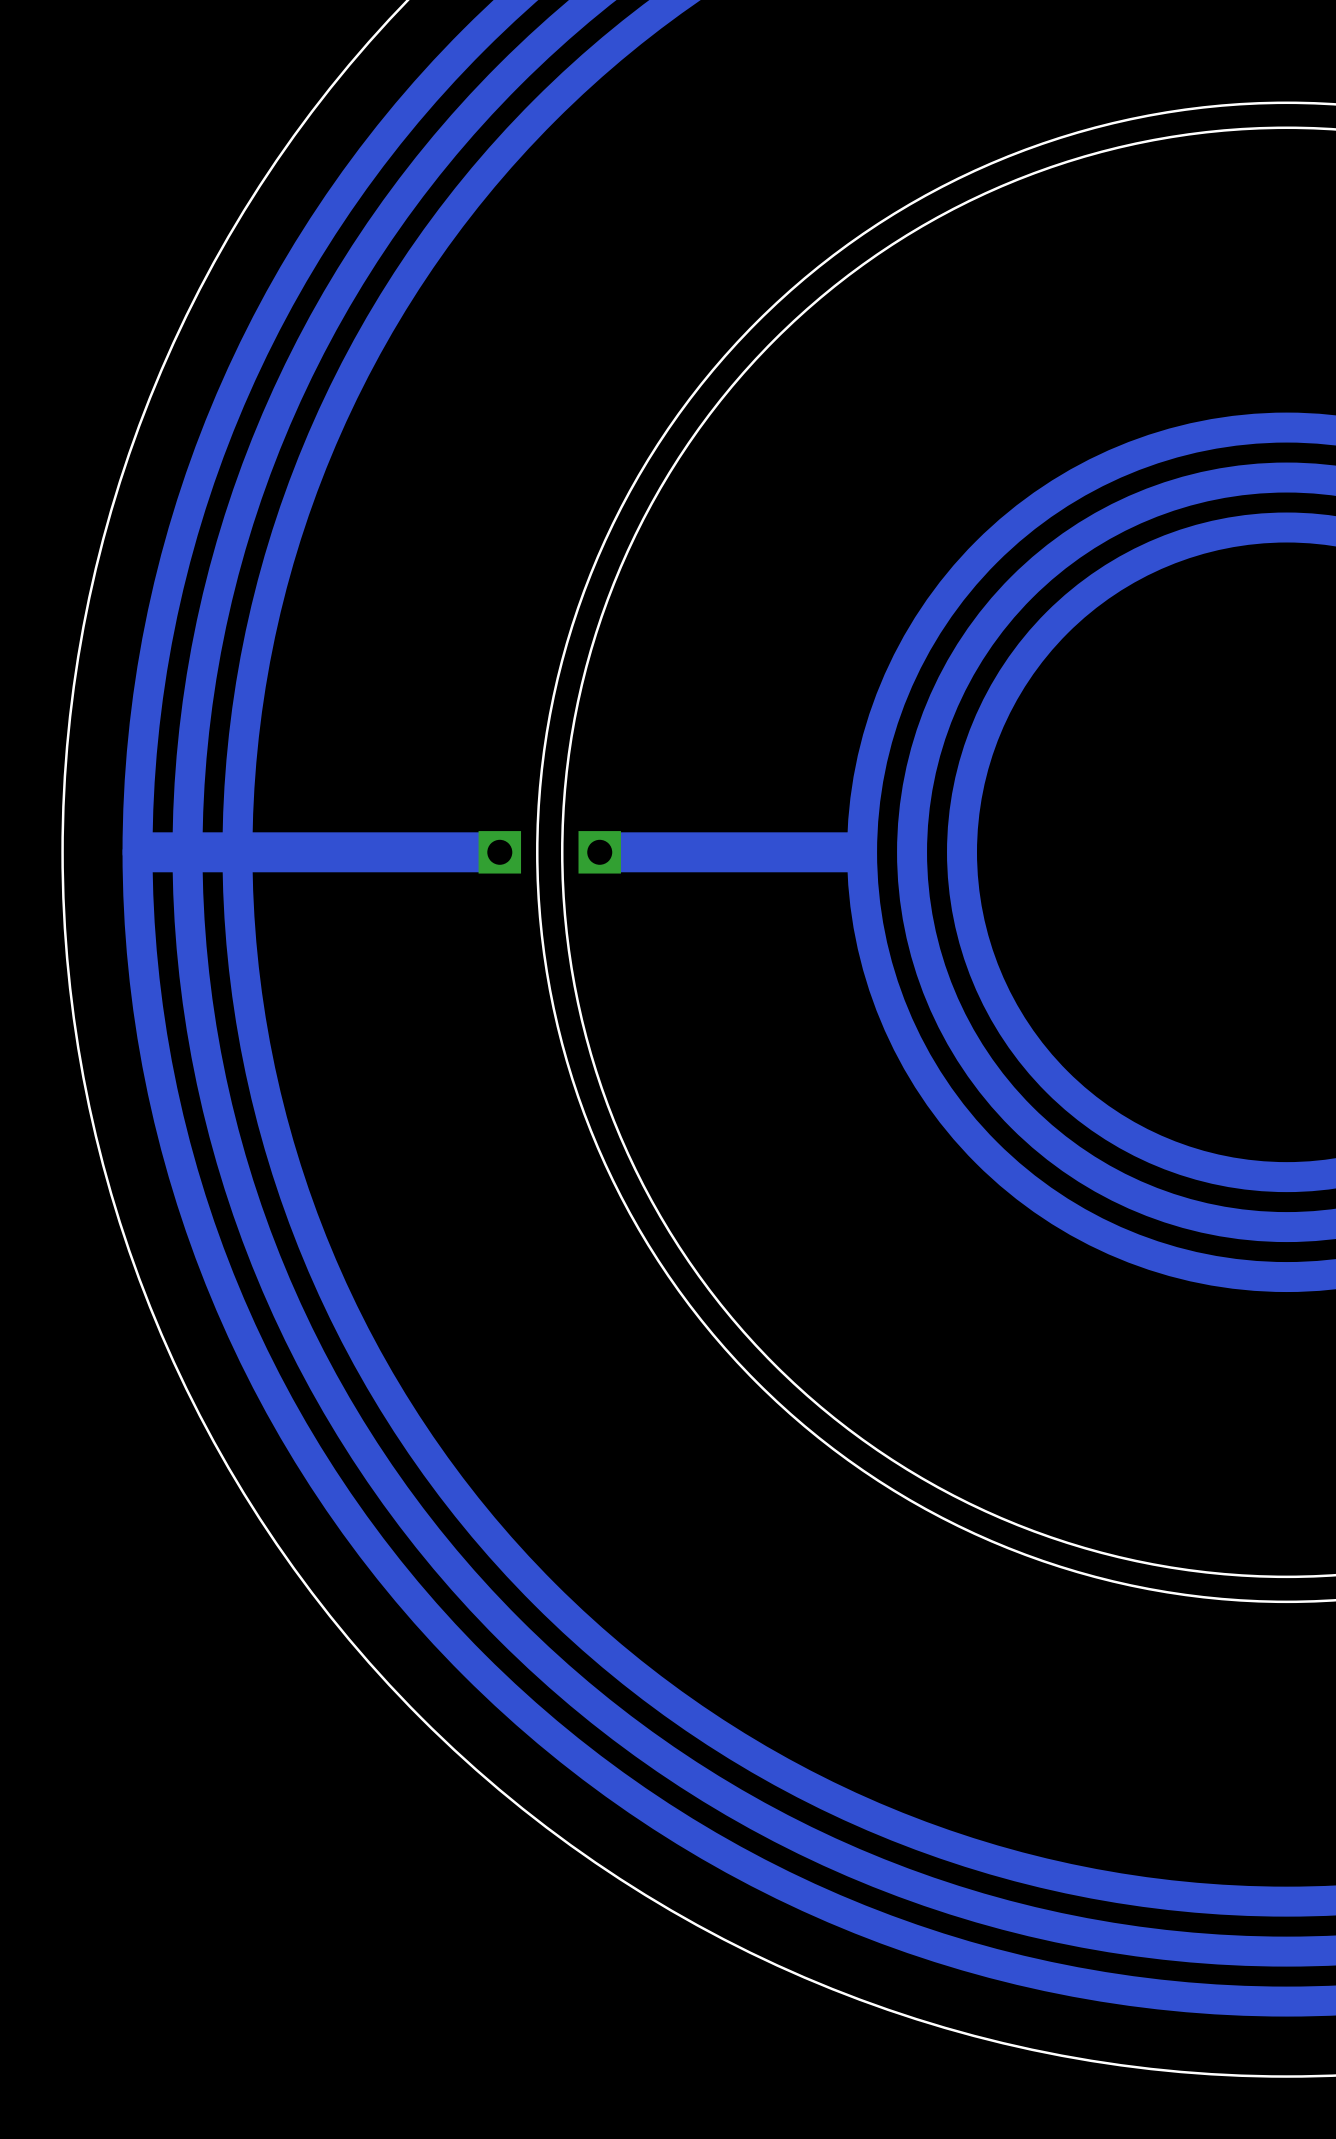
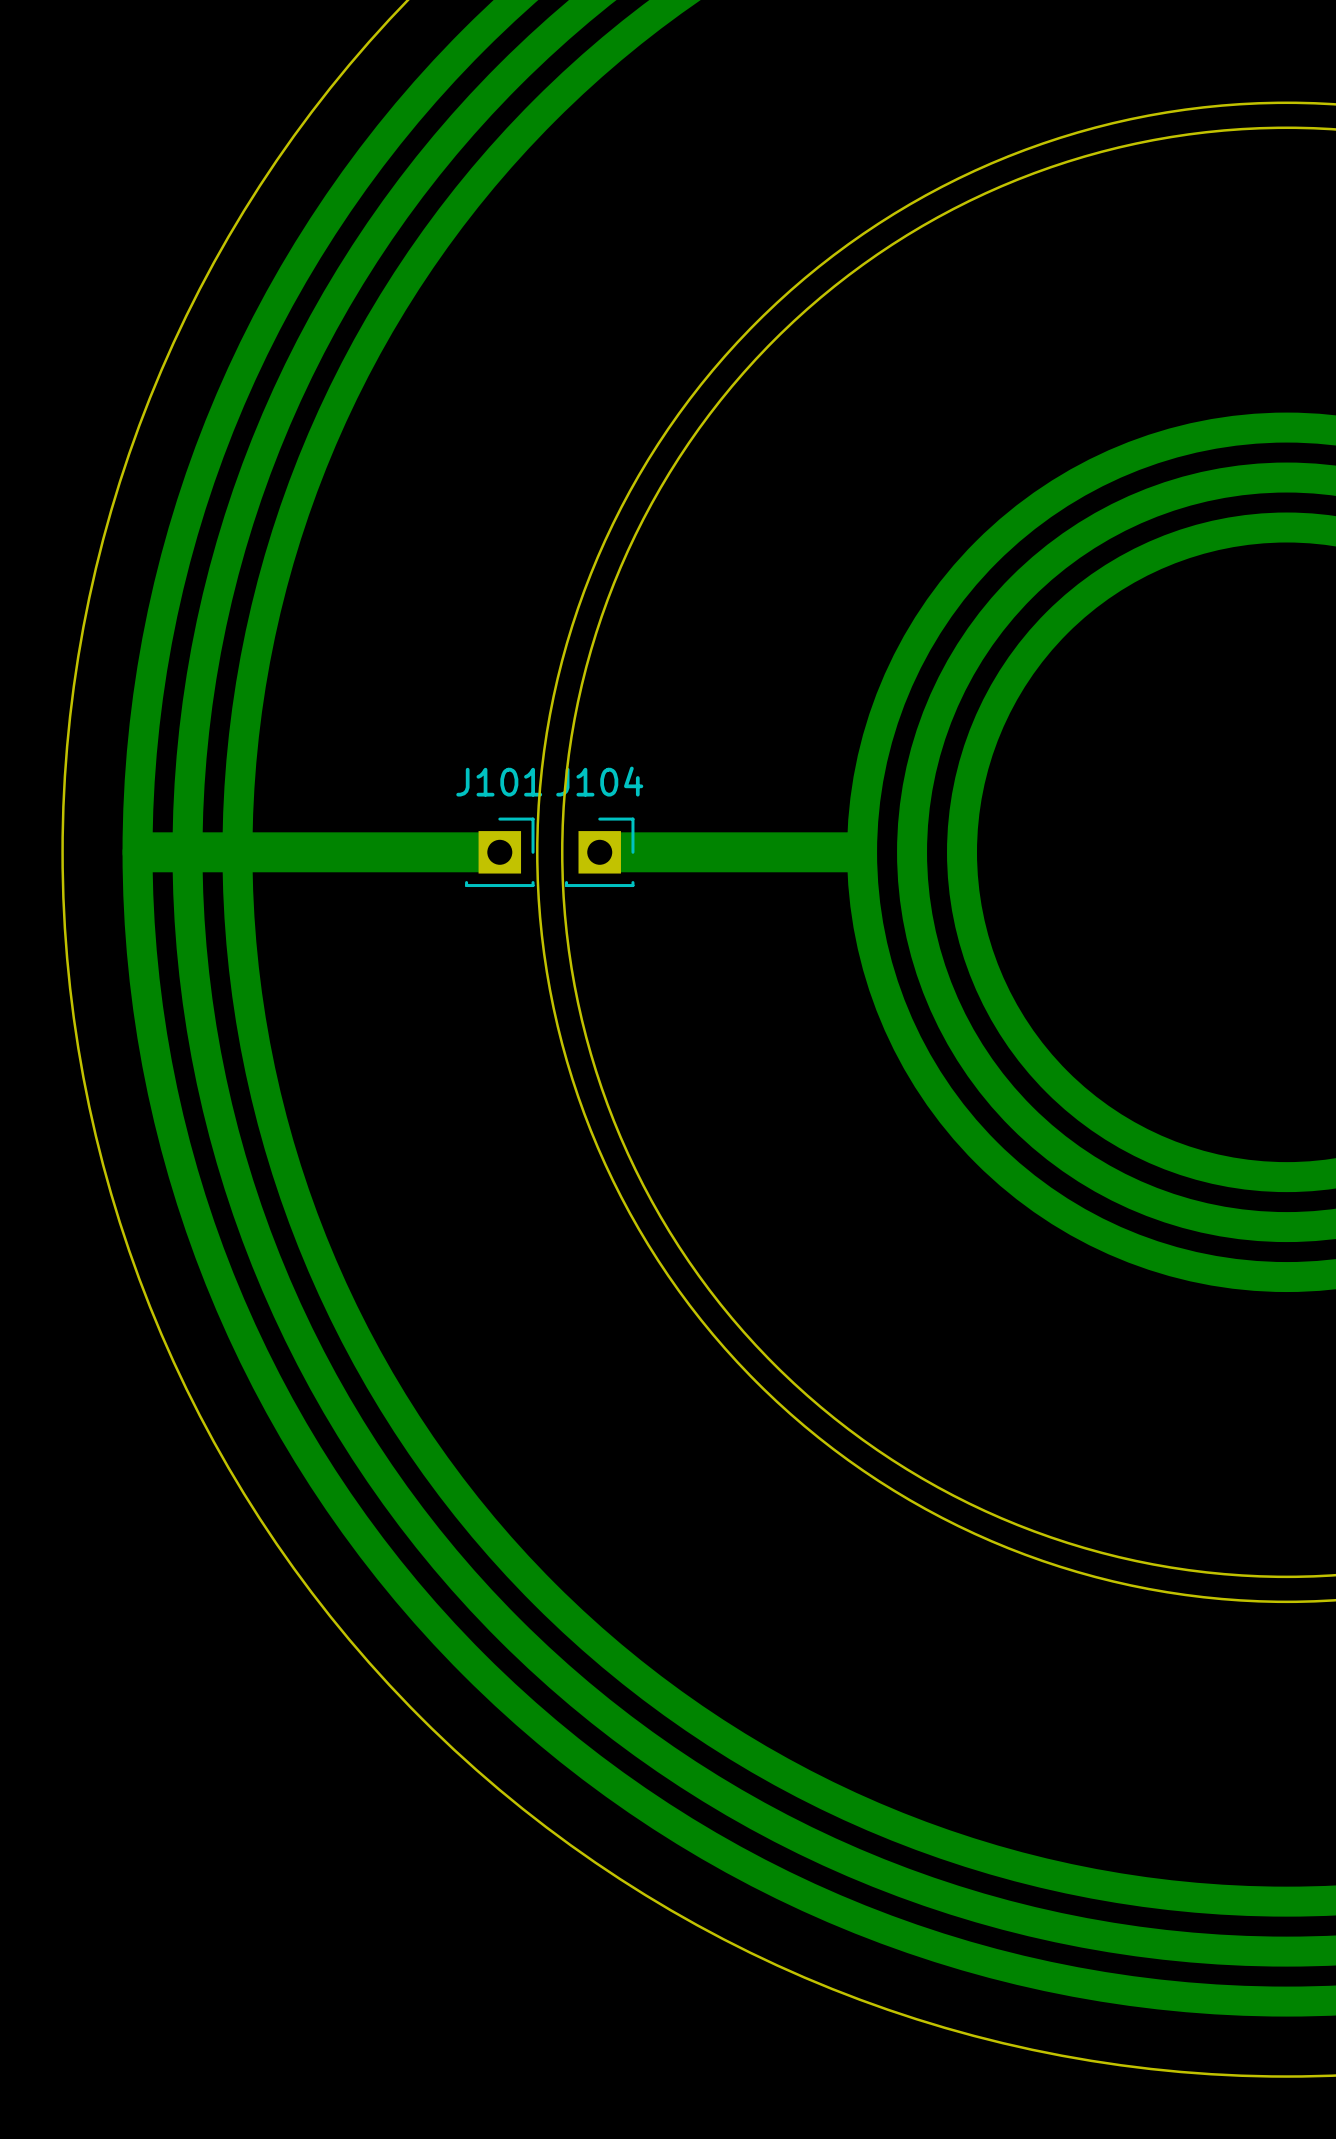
J101 side: bottom (499, 852) -> top (499, 852)
J104 side: bottom (599, 852) -> top (599, 852)

